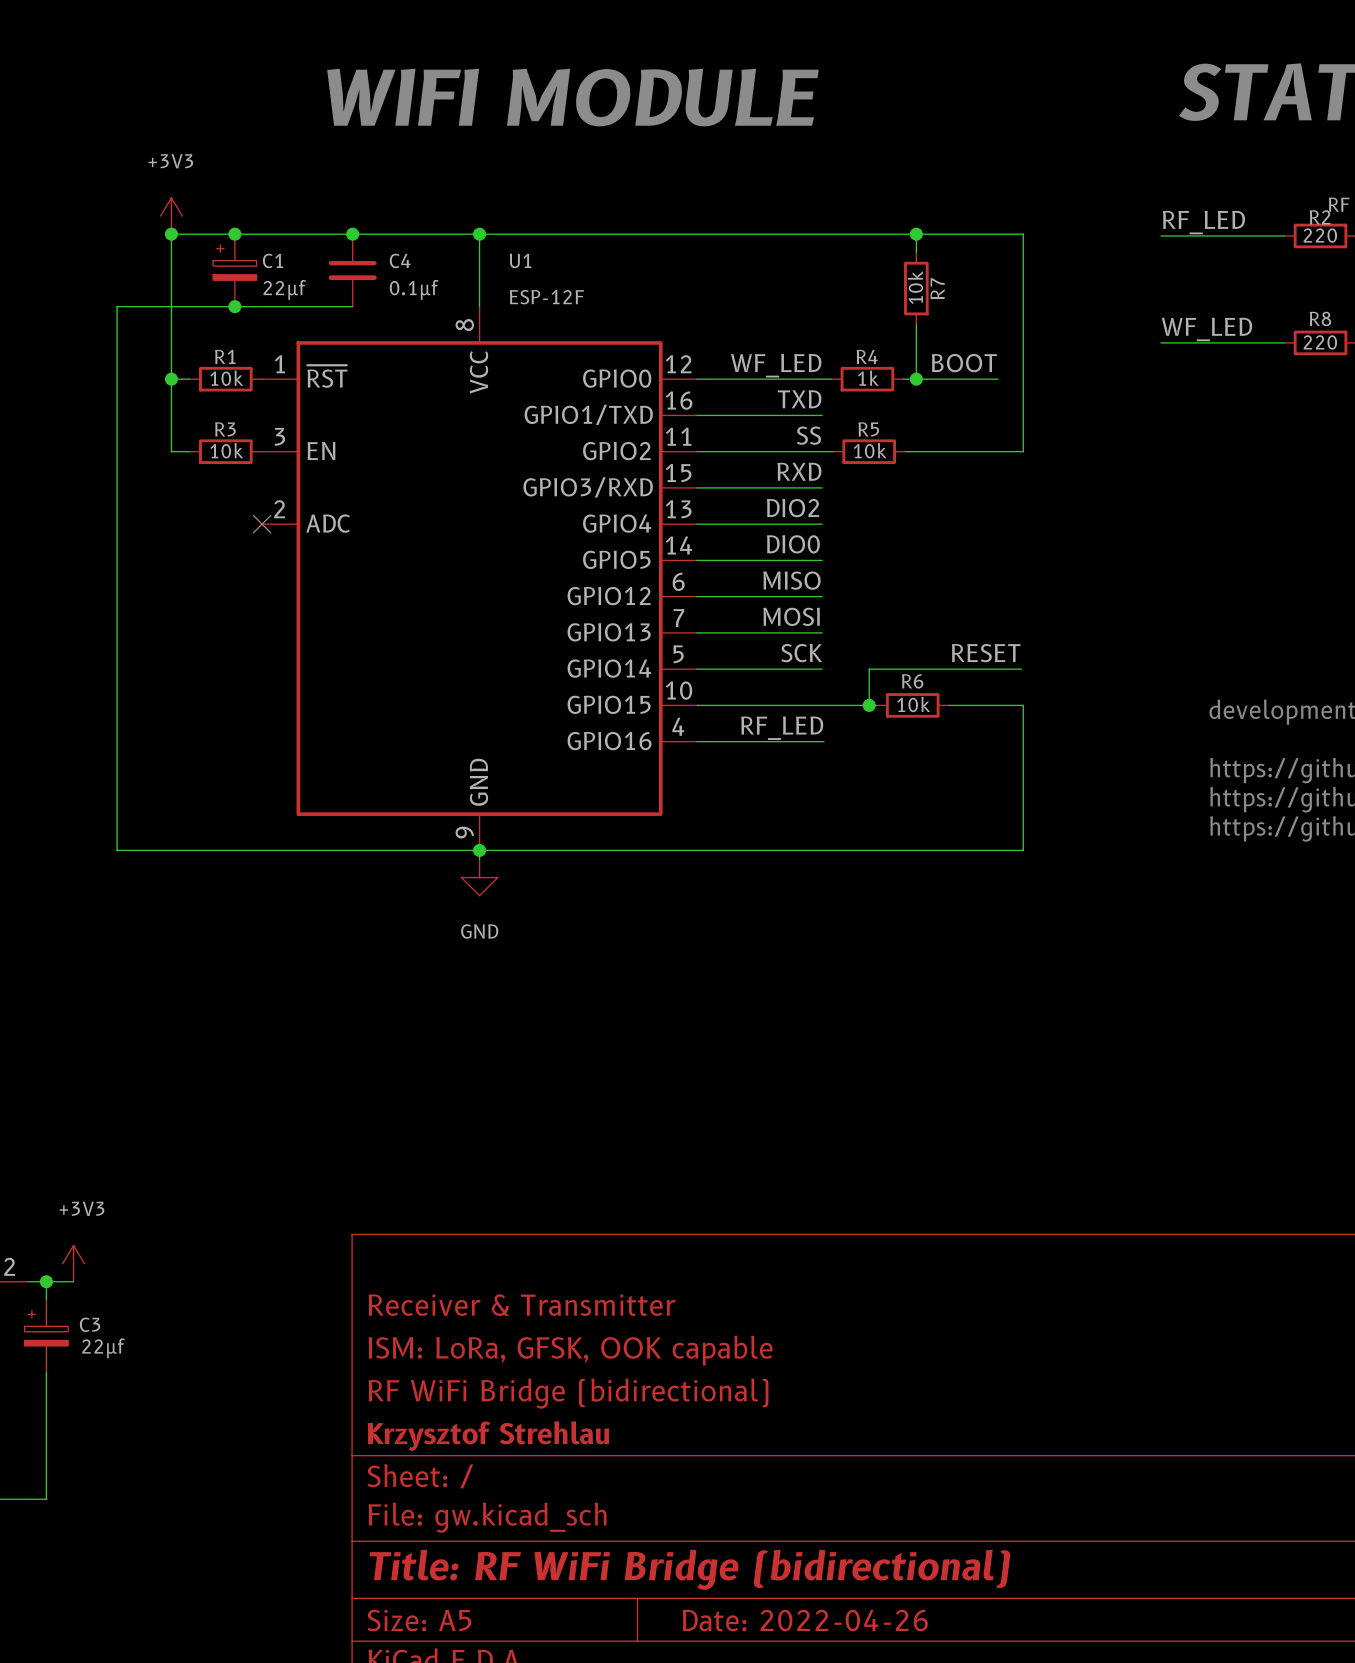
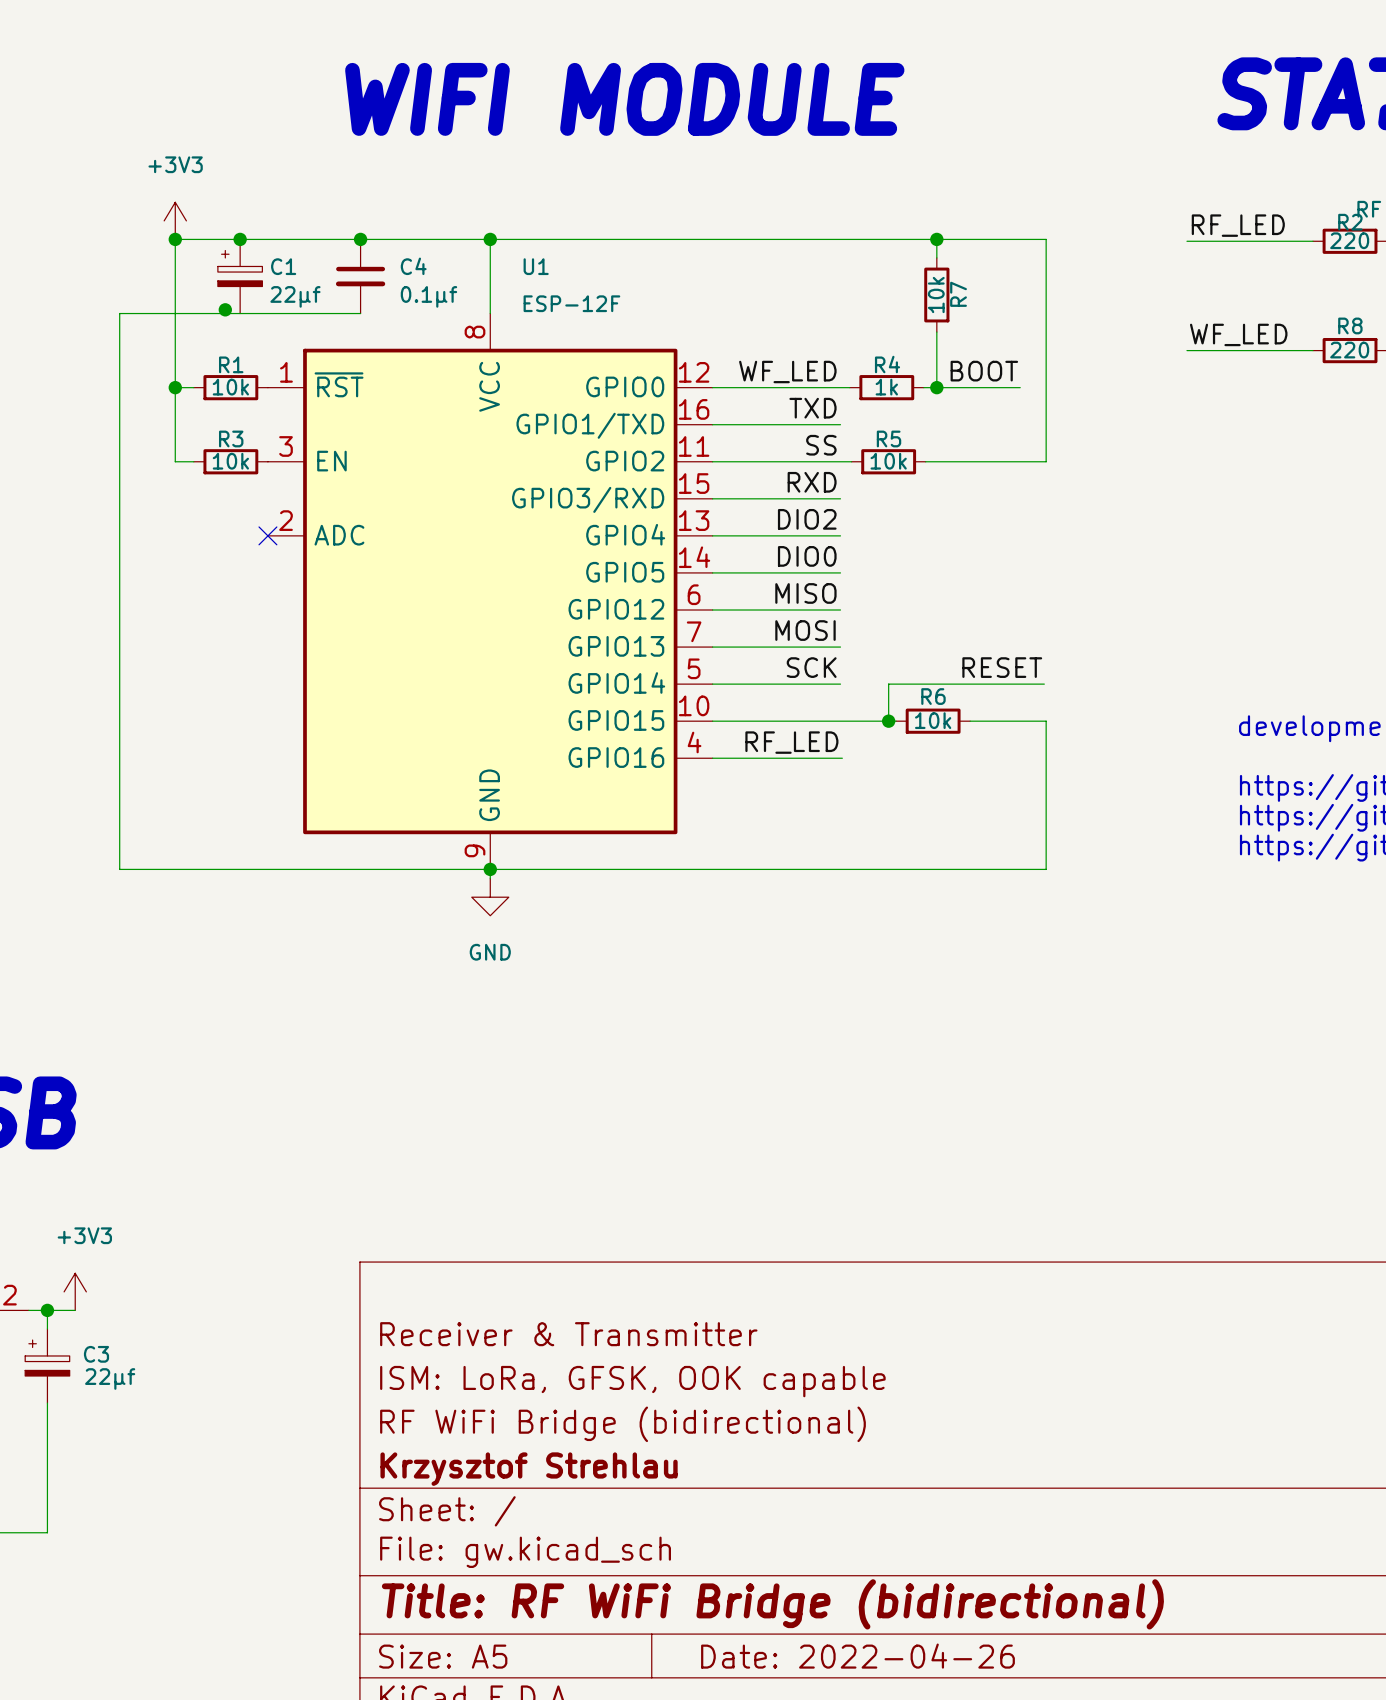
junction position: (234, 306) -> (225, 309)

